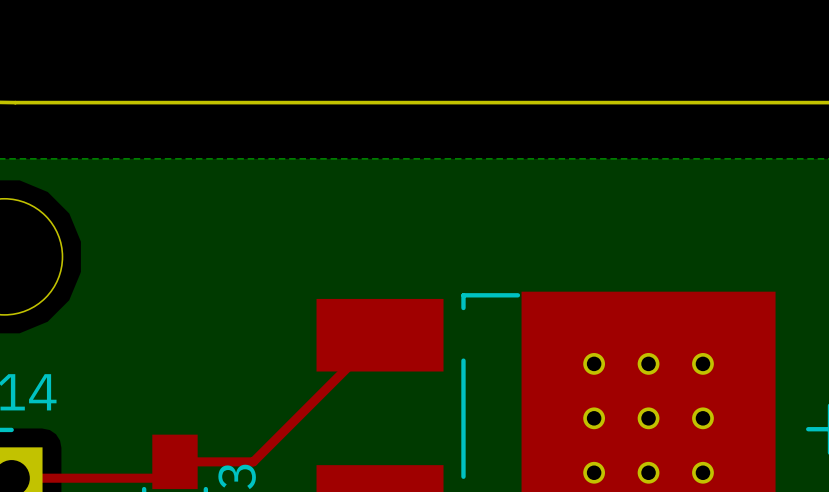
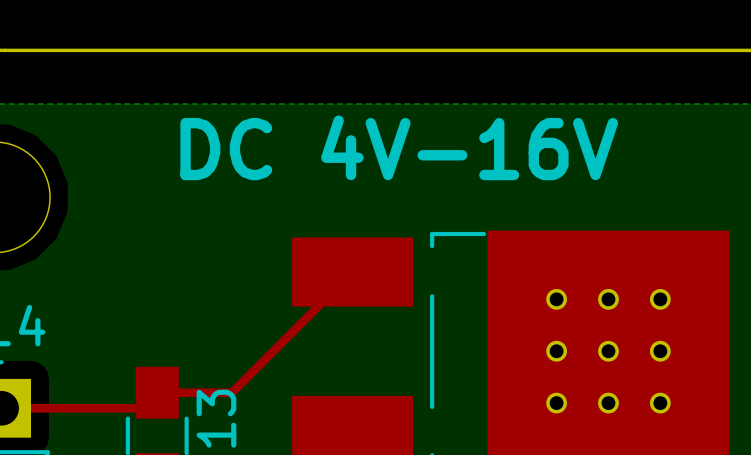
text: none -> DC 4V-16V (399, 147)

